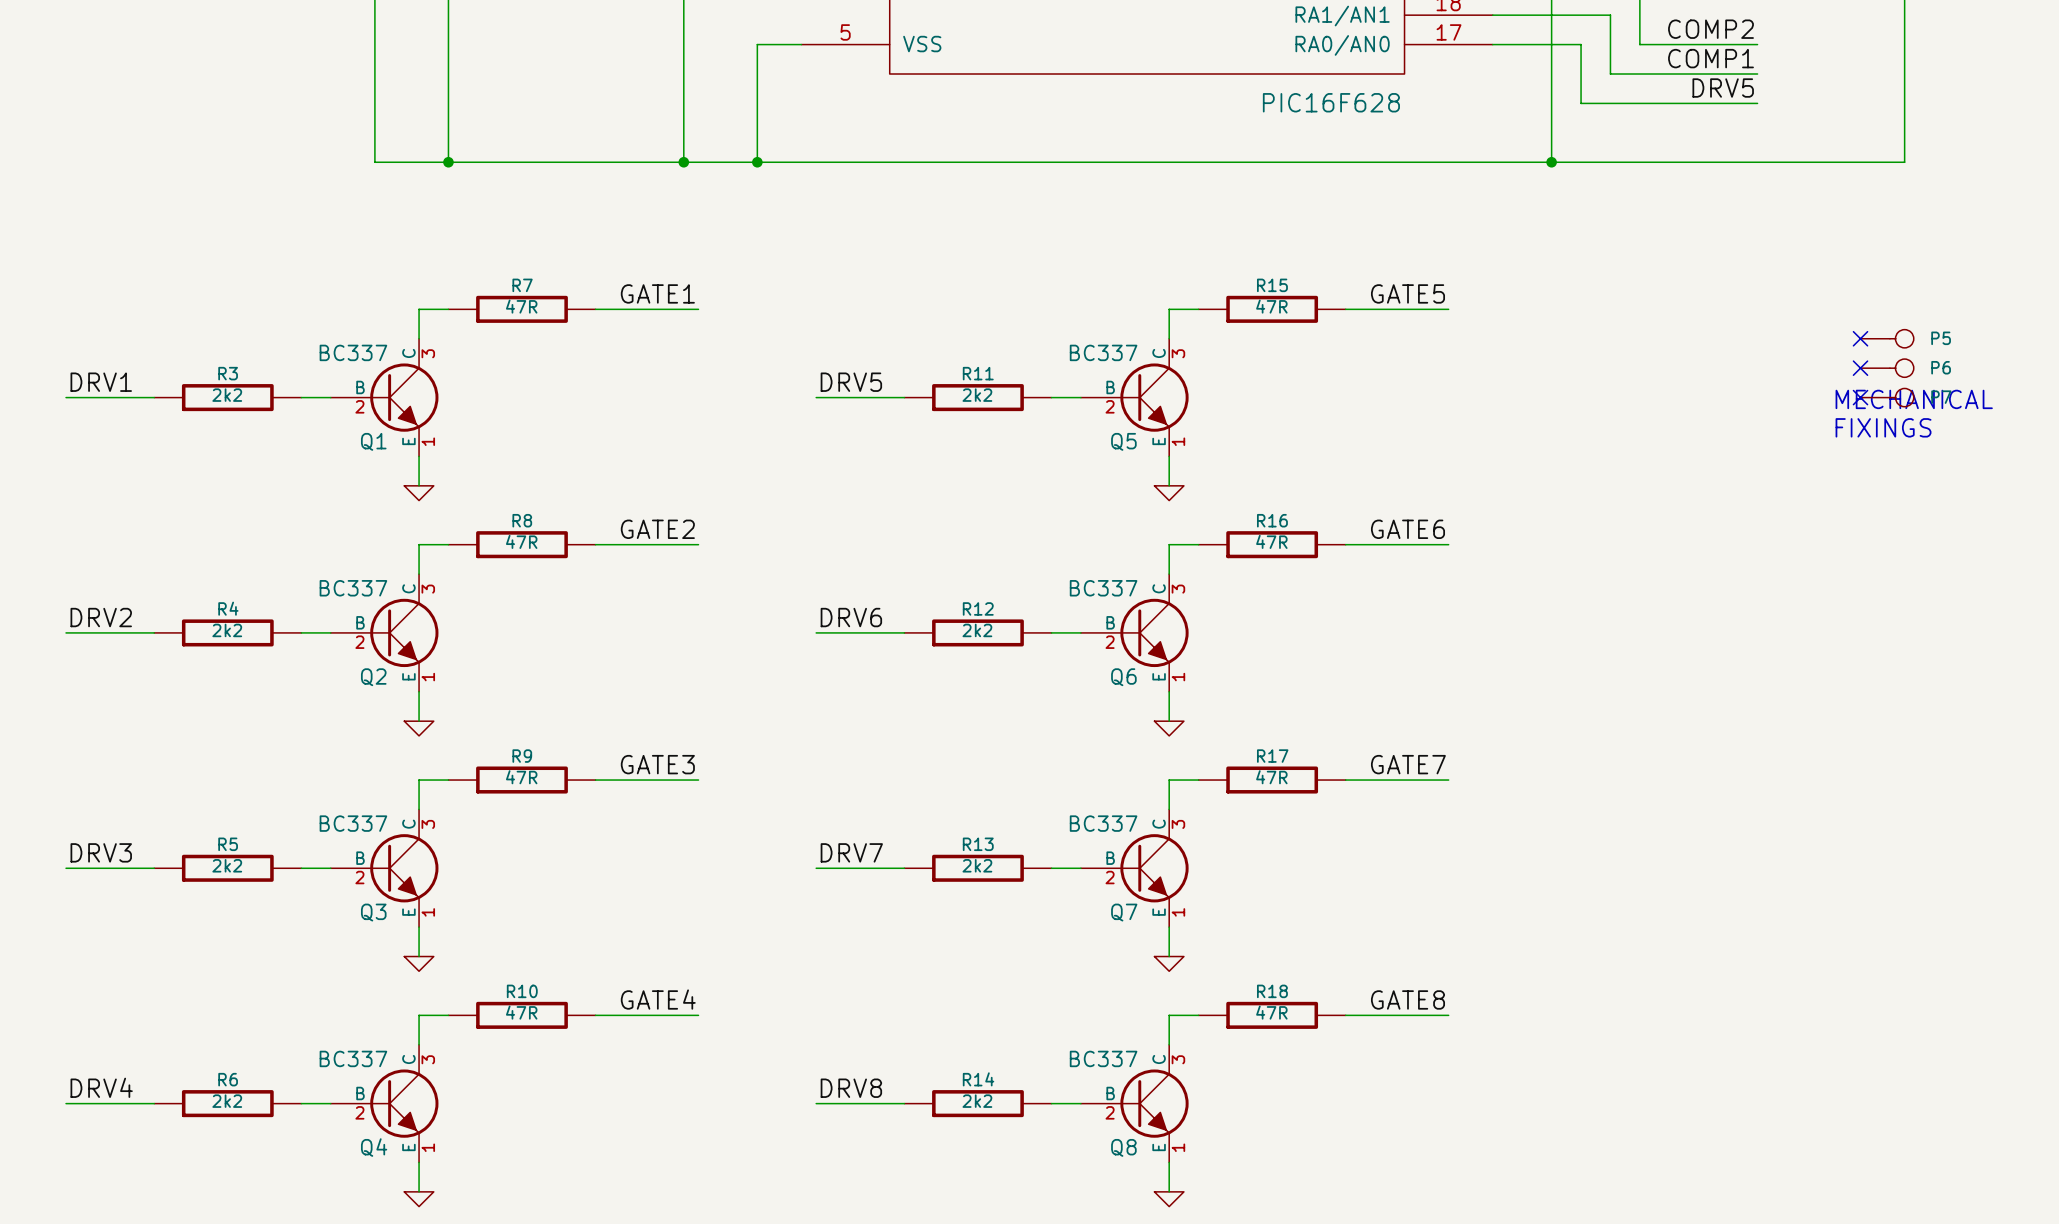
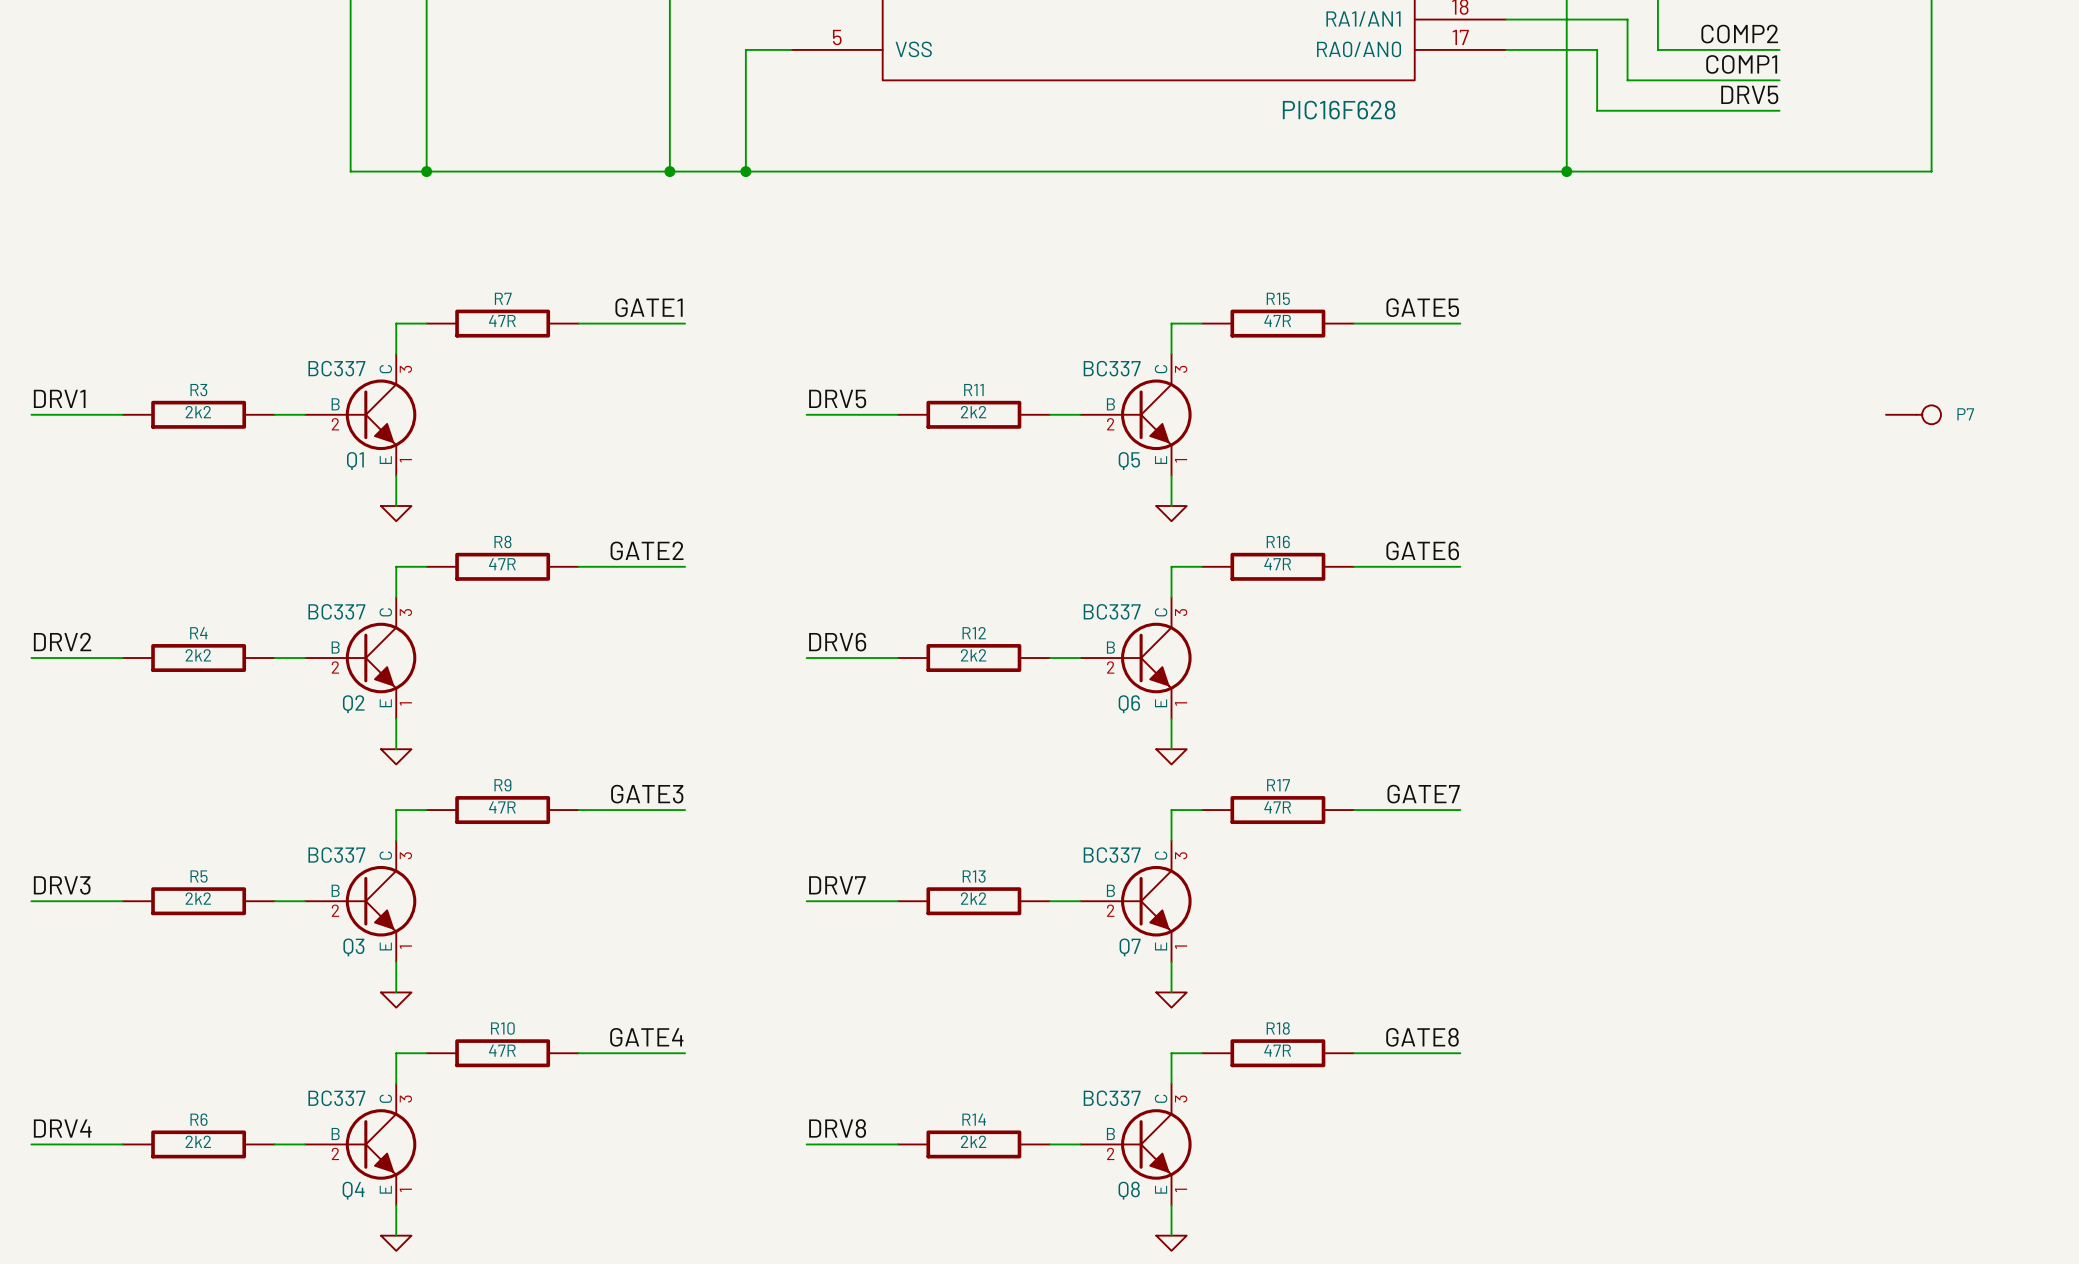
no-connect mark: (1860, 338) -> none
P5: (1887, 338) -> none
no-connect mark: (1860, 368) -> none
P6: (1887, 368) -> none
no-connect mark: (1860, 397) -> none
text: MECHANICAL (1914, 399) -> none
text: FIXINGS (1883, 427) -> none

